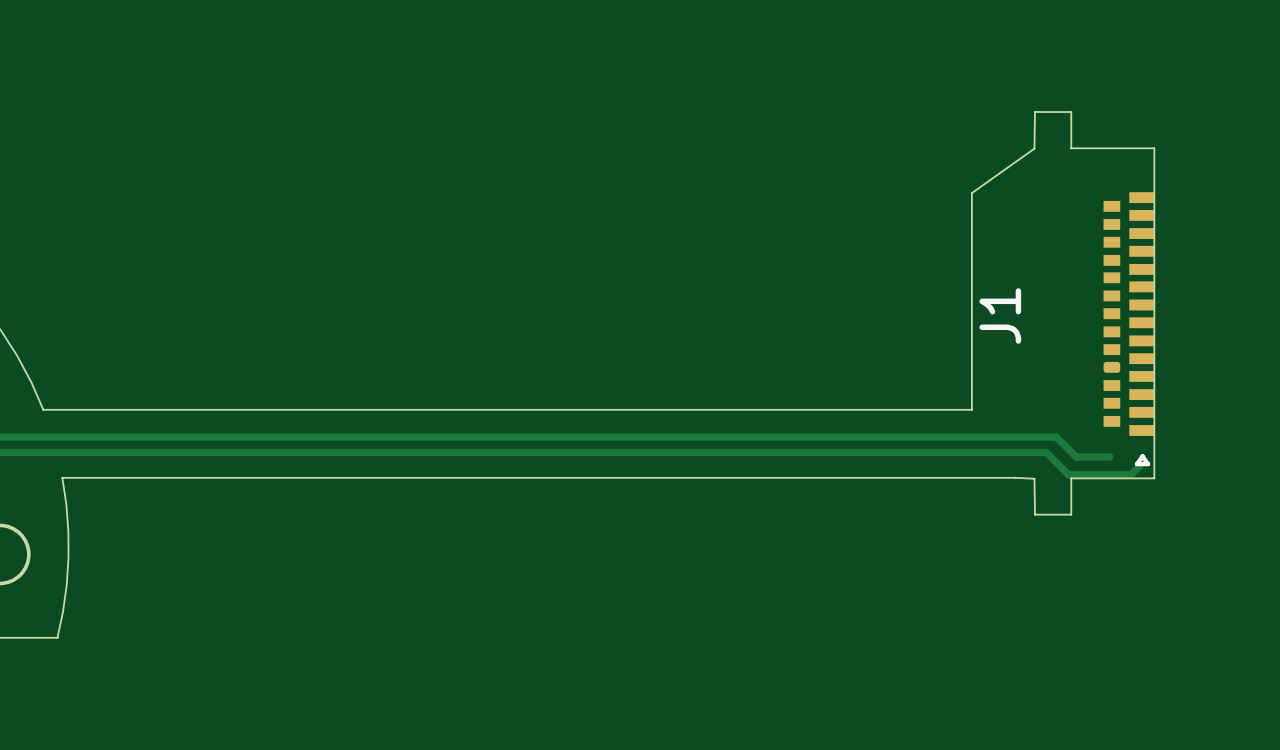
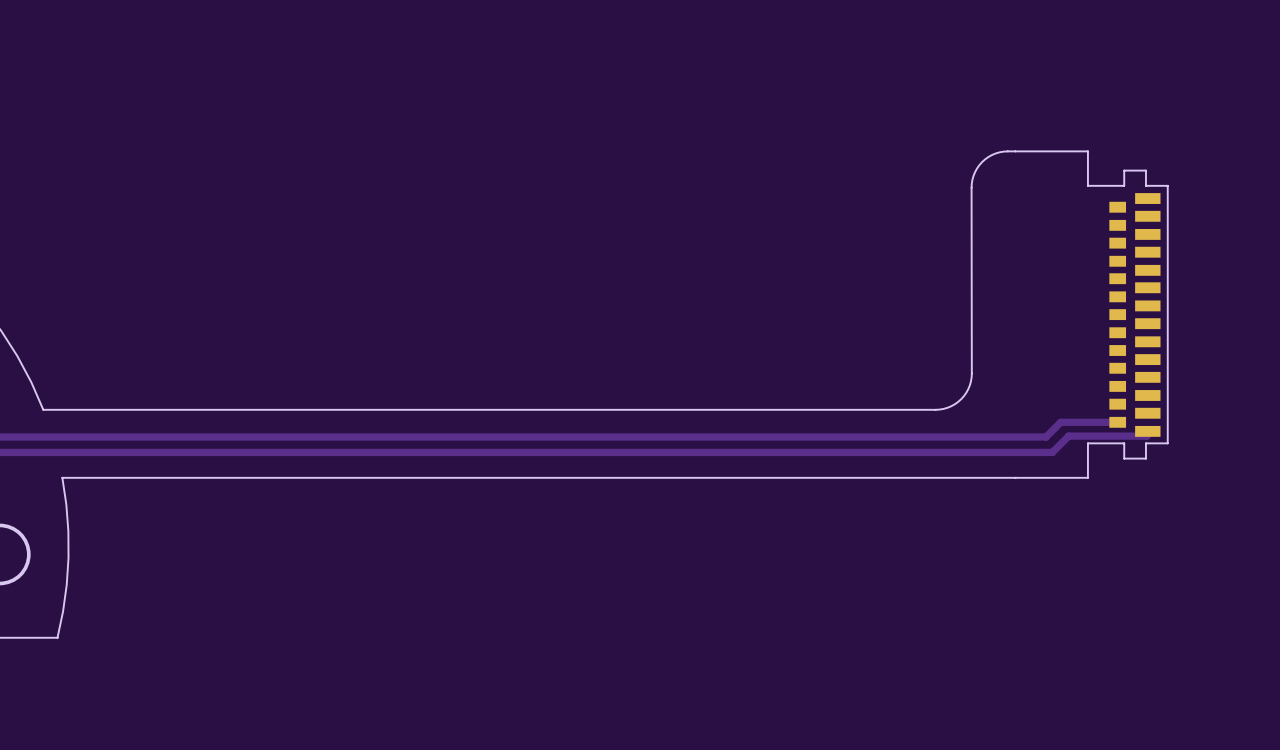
board edge: (1035, 112) (1034, 148) (971, 193) (971, 409) (935, 409) -> (1015, 151) (999, 152) (988, 156) (979, 165) (973, 175) (971, 187) (971, 377) (968, 389) (958, 401) (947, 407) (935, 409)
J1: (1094, 313) -> none
part: none -> (1091, 314)
track: (1046, 437) (1056, 437) (1076, 456) (1109, 456) -> (1046, 437) (1060, 422) (1117, 422)
track: (1046, 452) (1068, 474) (1131, 474) (1139, 466) -> (1046, 452) (1052, 452) (1068, 436) (1146, 436) (1152, 430)
board edge: (1015, 477) (1034, 478) (1035, 514) -> none

